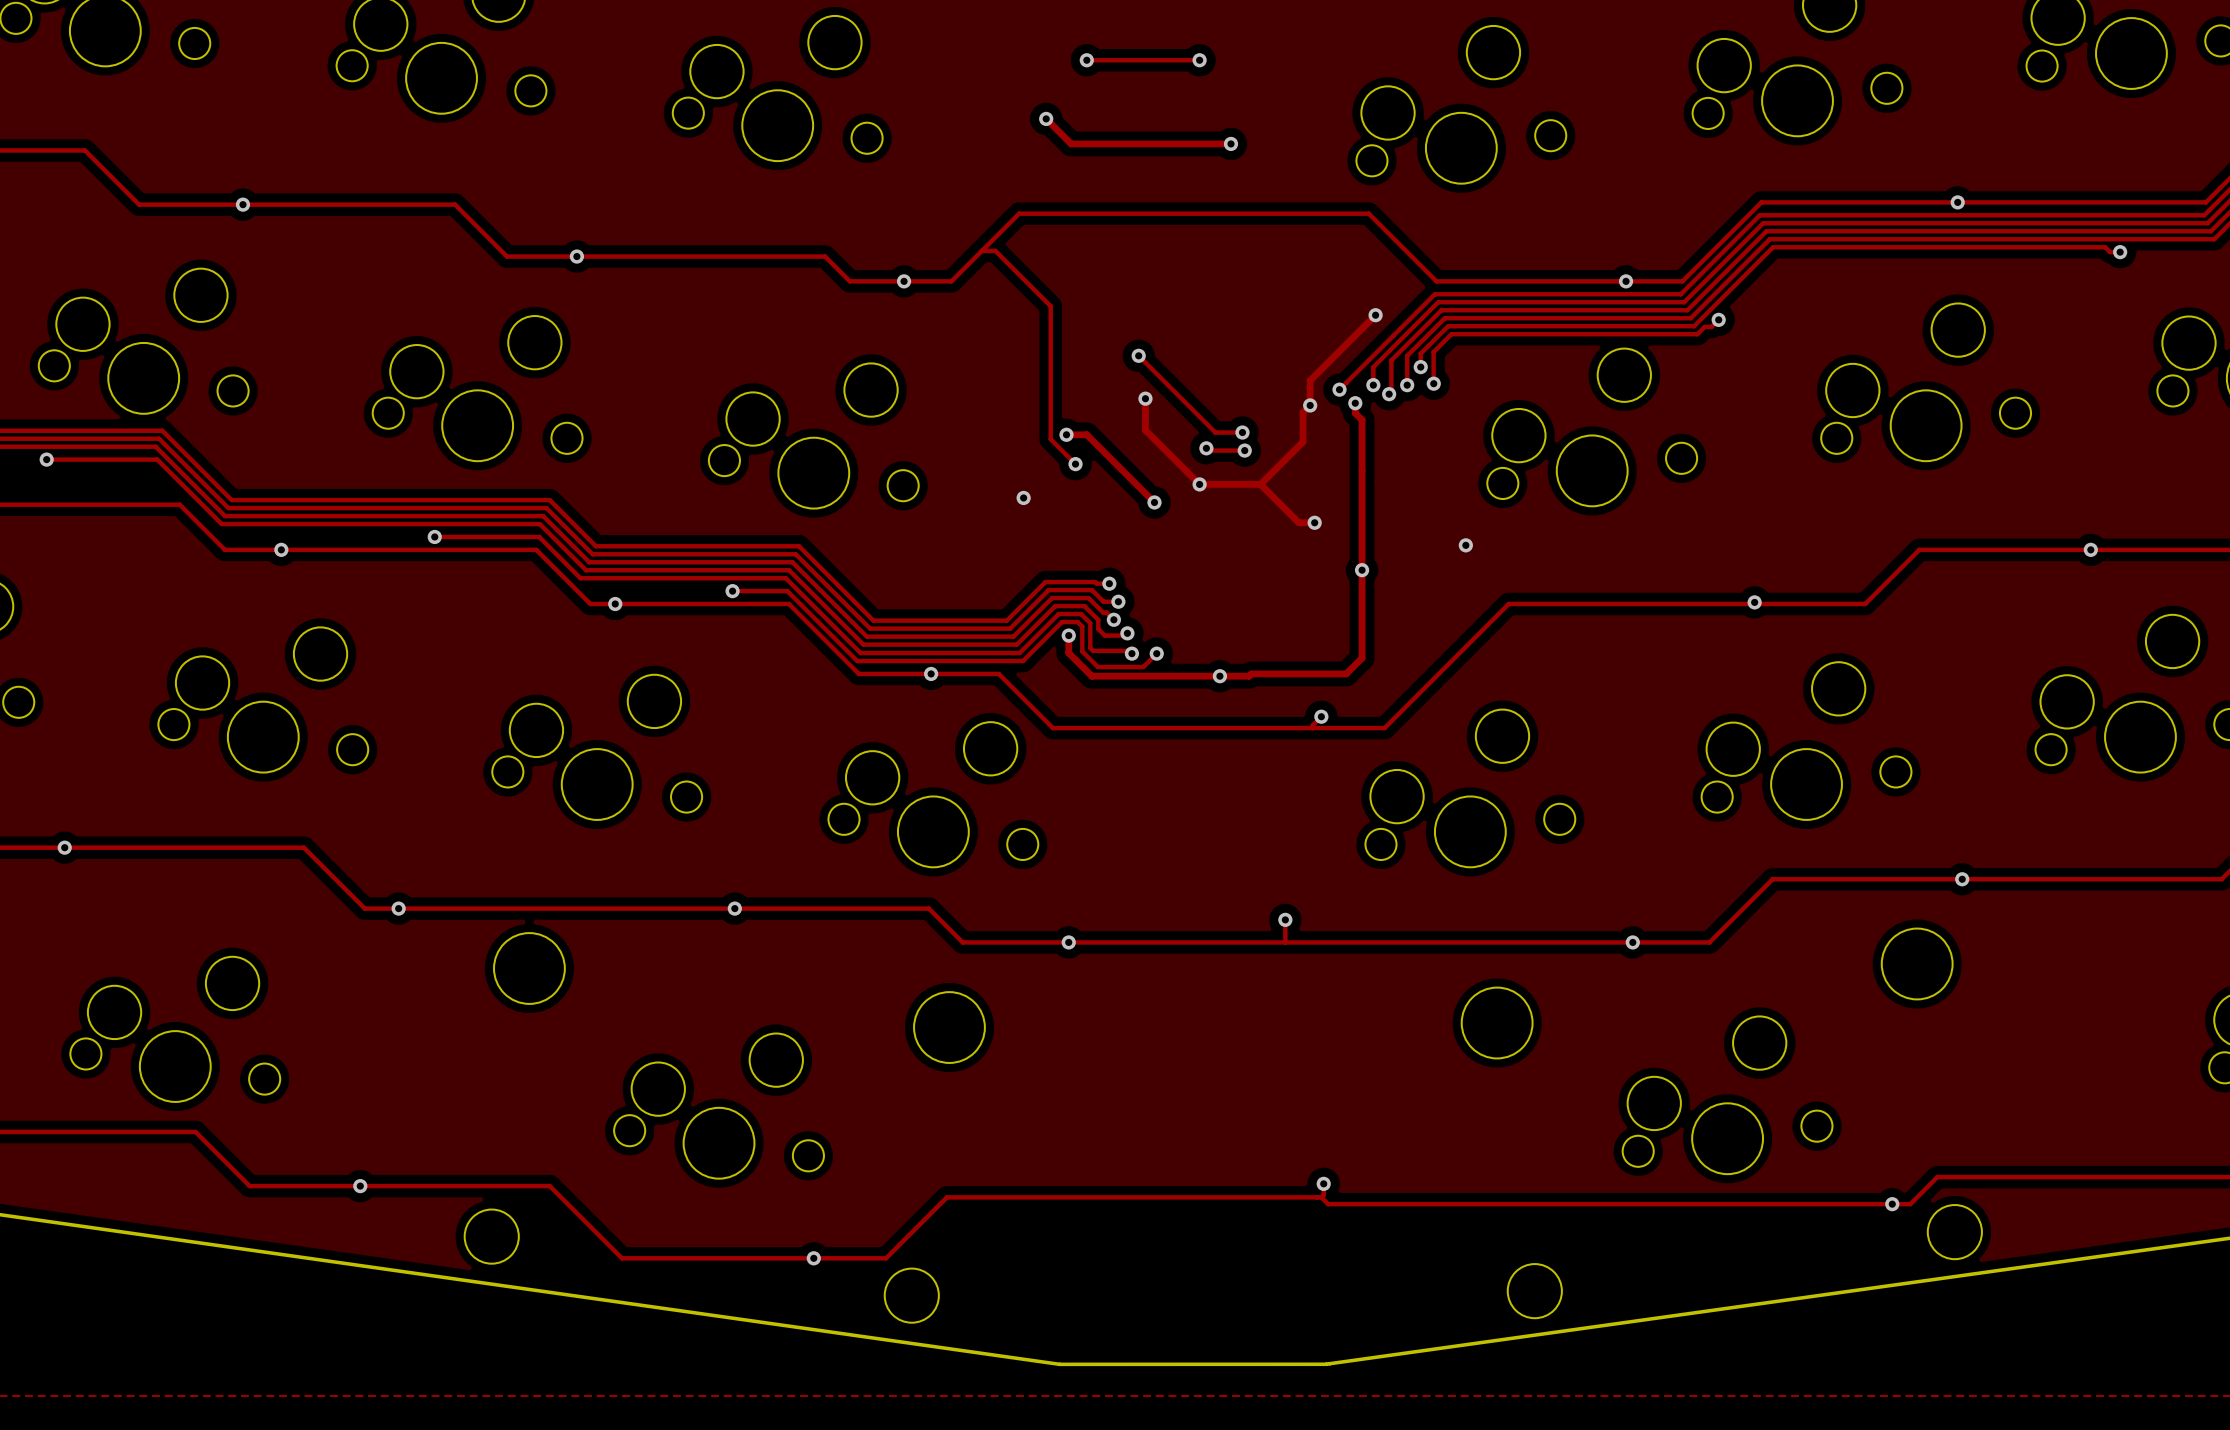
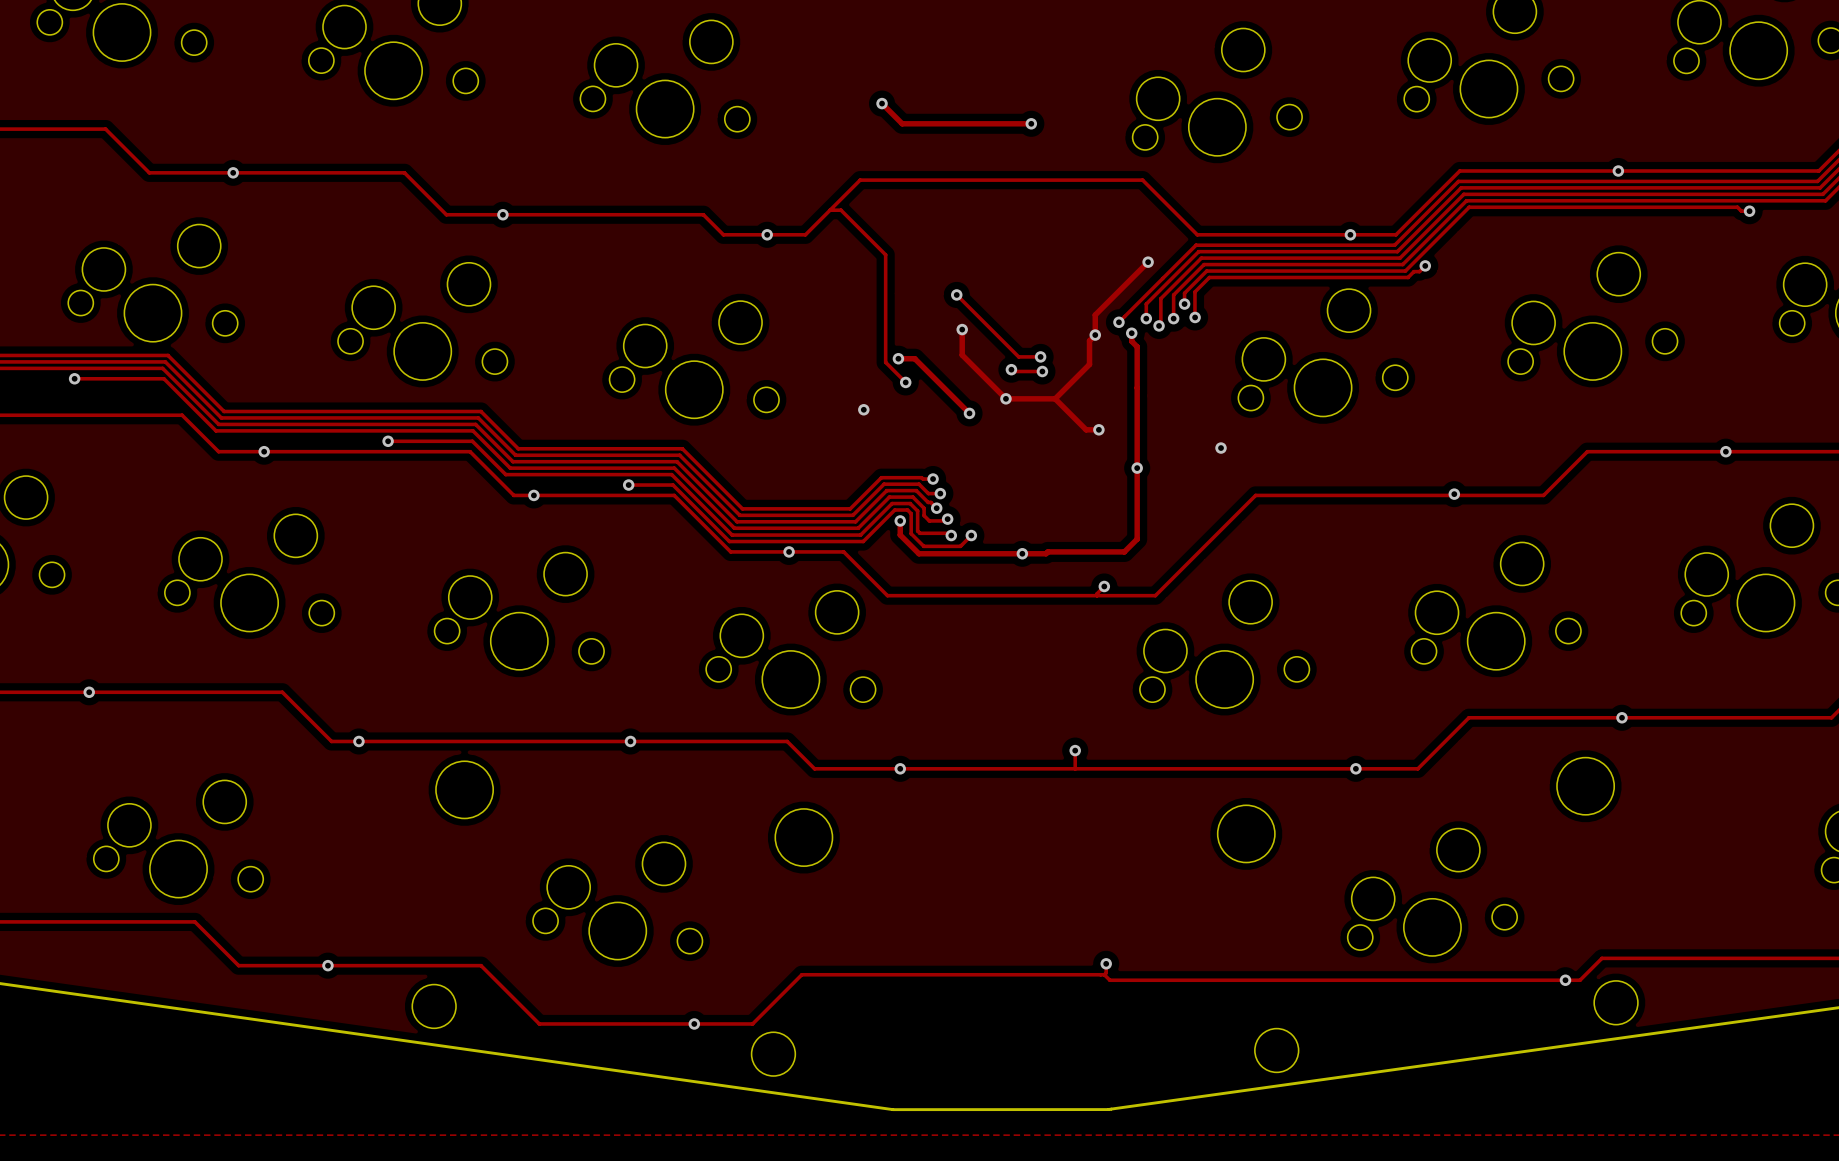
track: (1086, 60) (1199, 60) -> none
via: (1086, 60) -> none
via: (1199, 60) -> none

